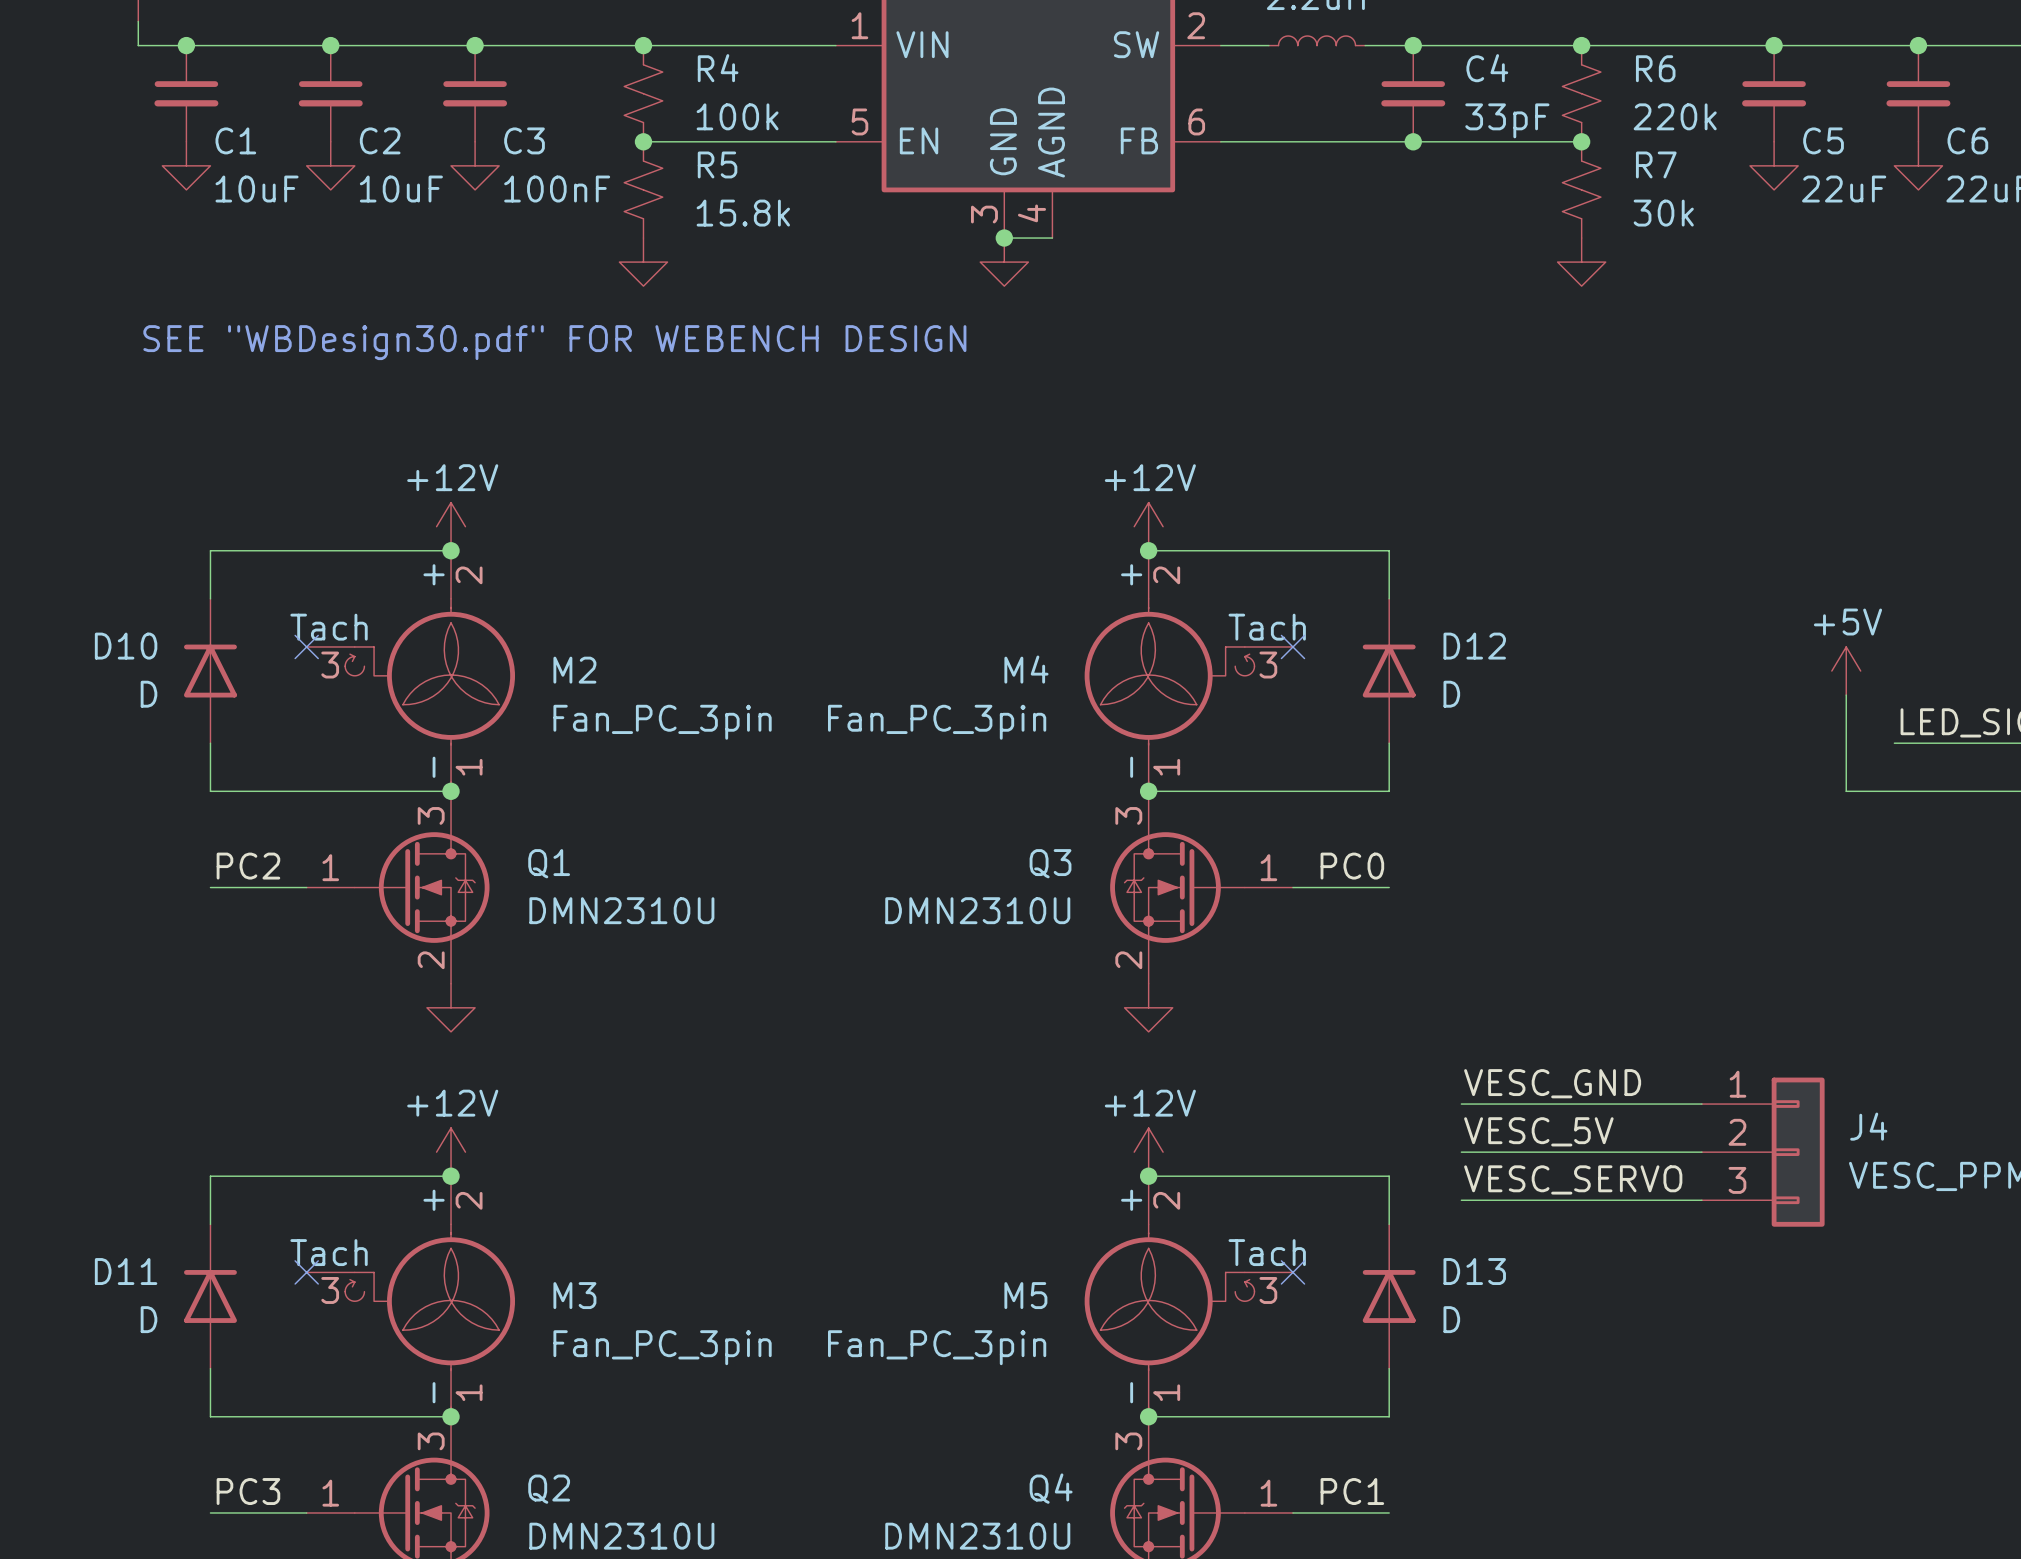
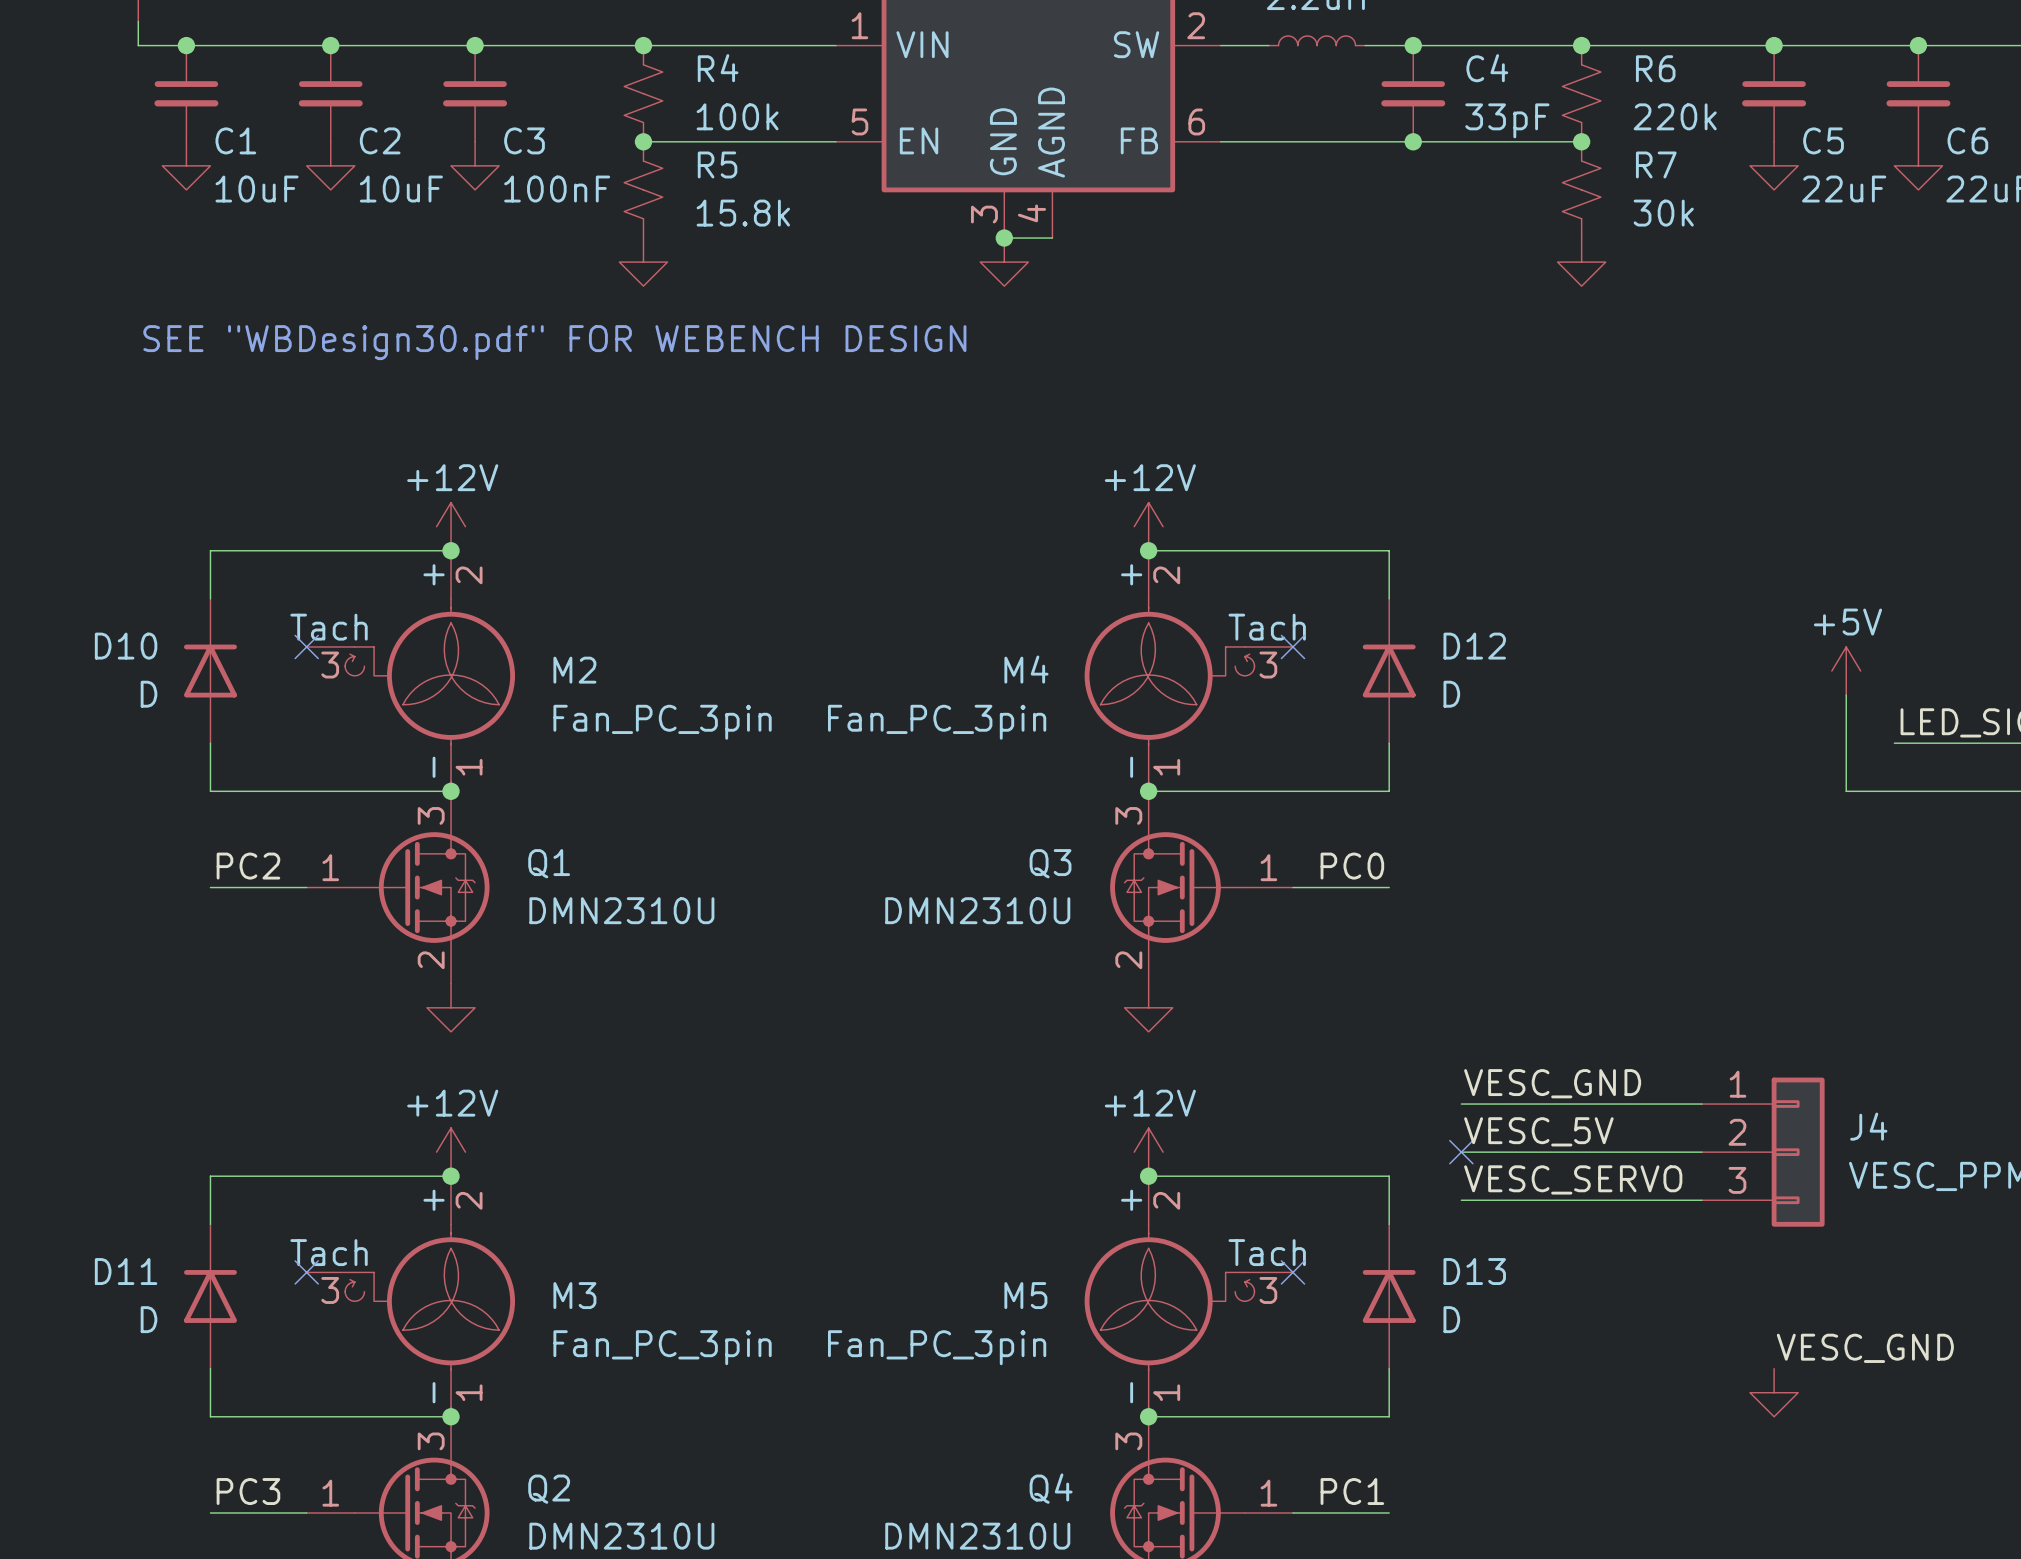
no-connect mark: none -> (1461, 1152)
label: none -> VESC_GND (1865, 1348)
power symbol: none -> (1774, 1392)

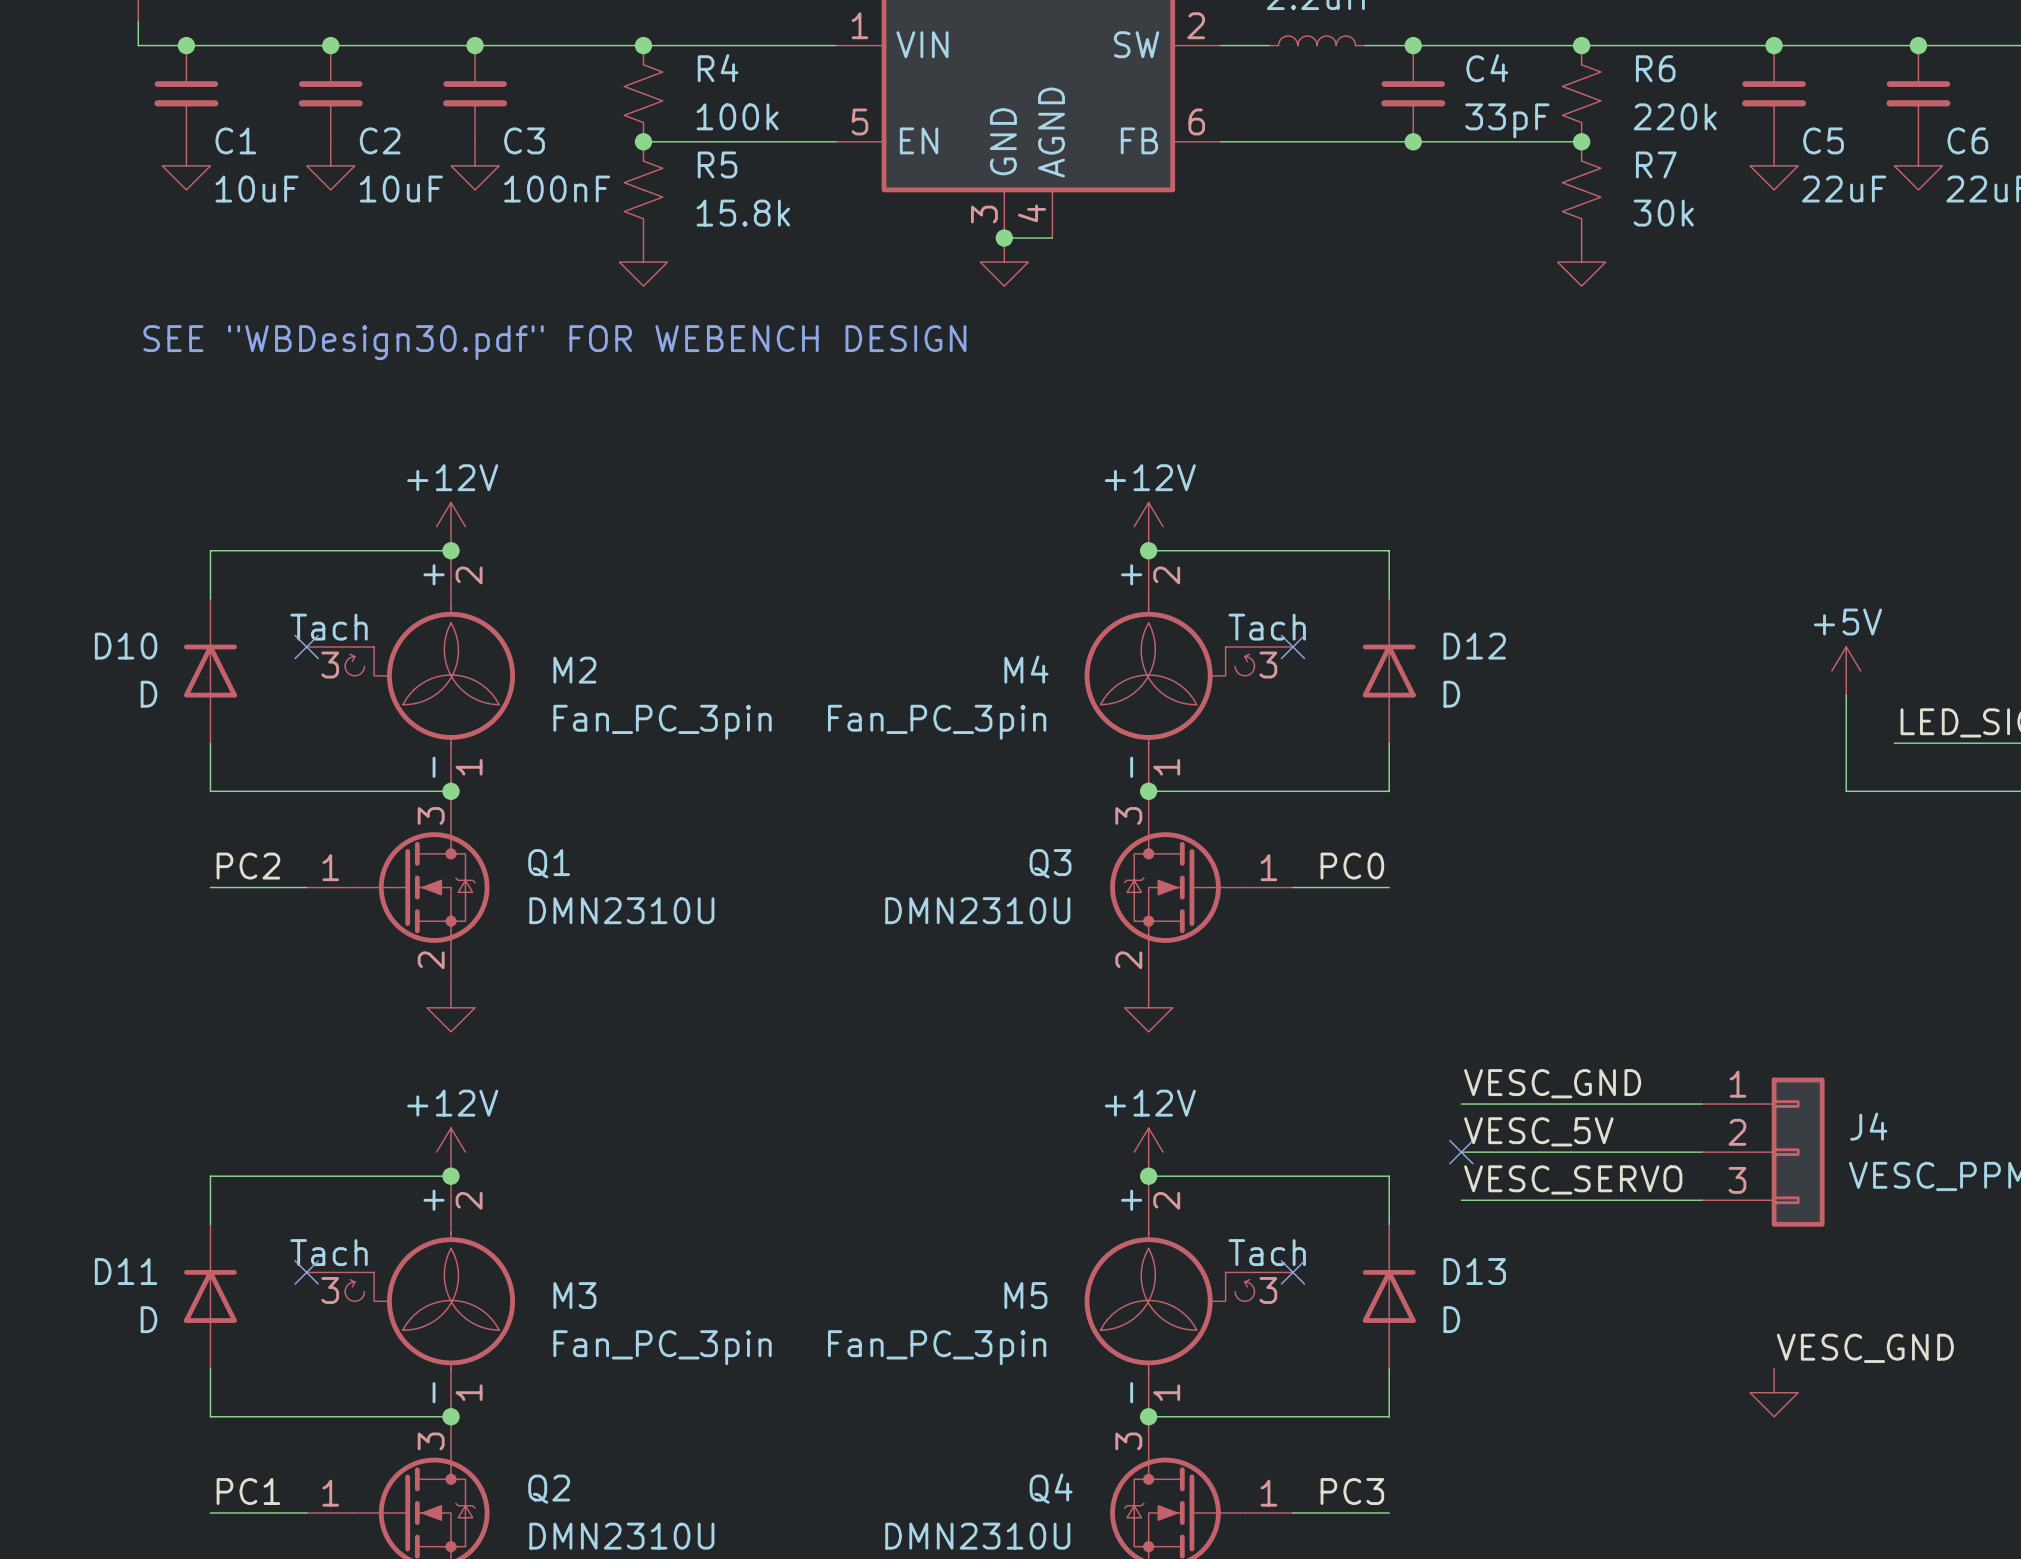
label: PC3 (248, 1491) -> PC1 (248, 1491)
label: PC1 (1352, 1491) -> PC3 (1352, 1491)

